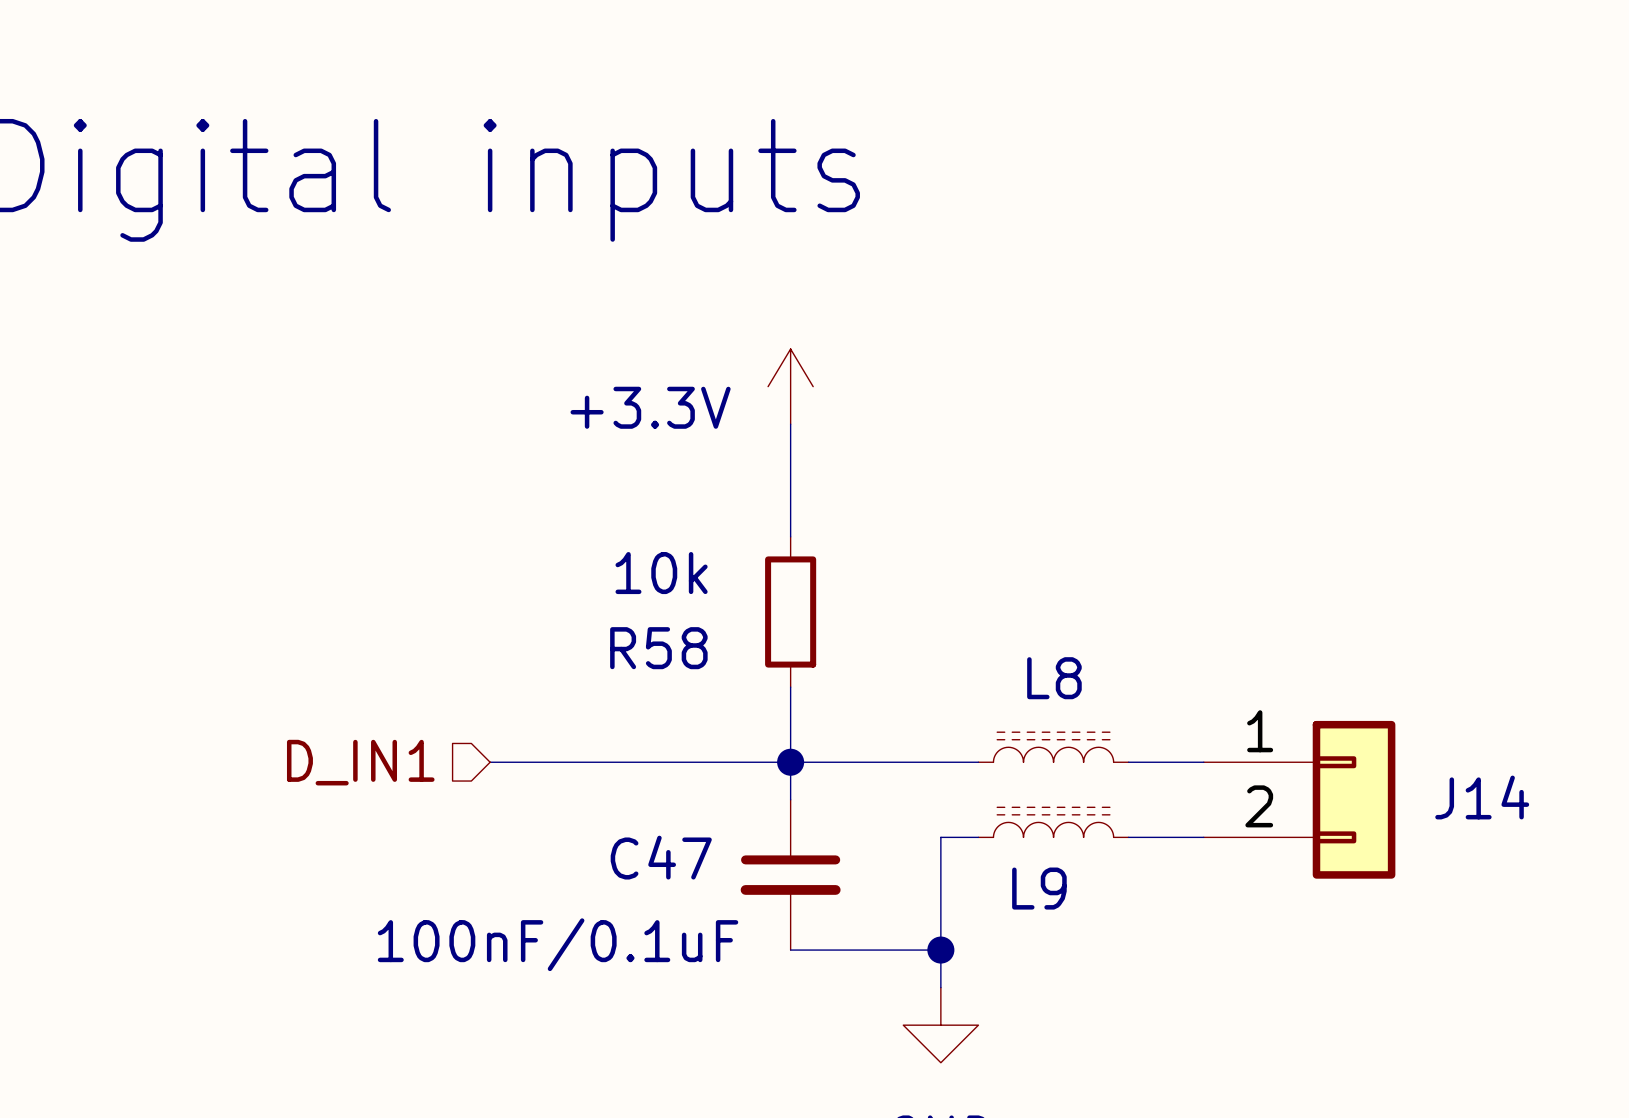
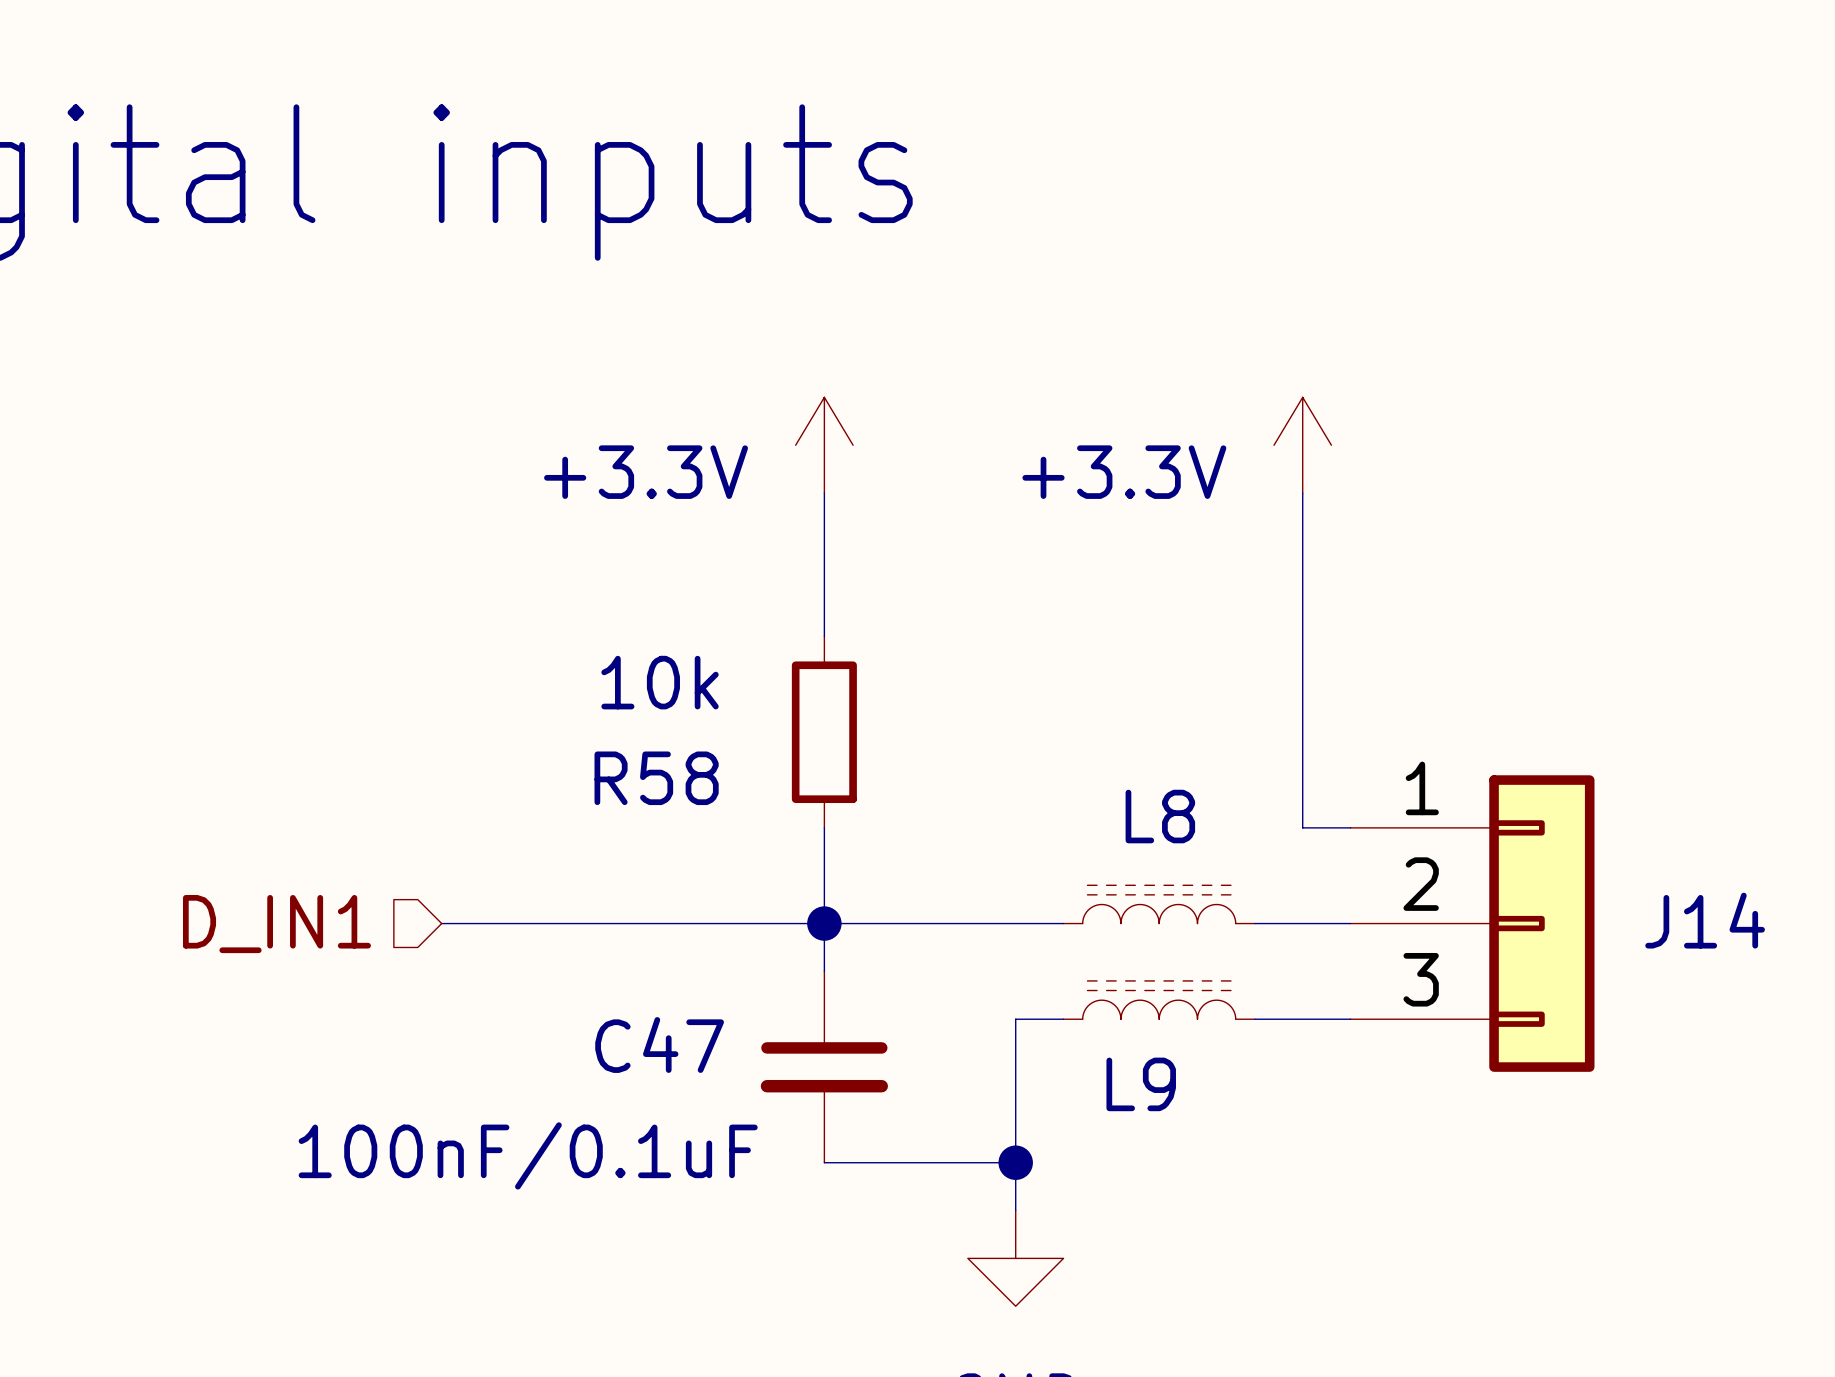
power symbol: none -> +3.3V (1302, 445)
wire: none -> (1302, 493) (1302, 827) (1350, 827)
J14 symbol: [1203, 720, 1396, 879] -> [1350, 775, 1595, 1072]

